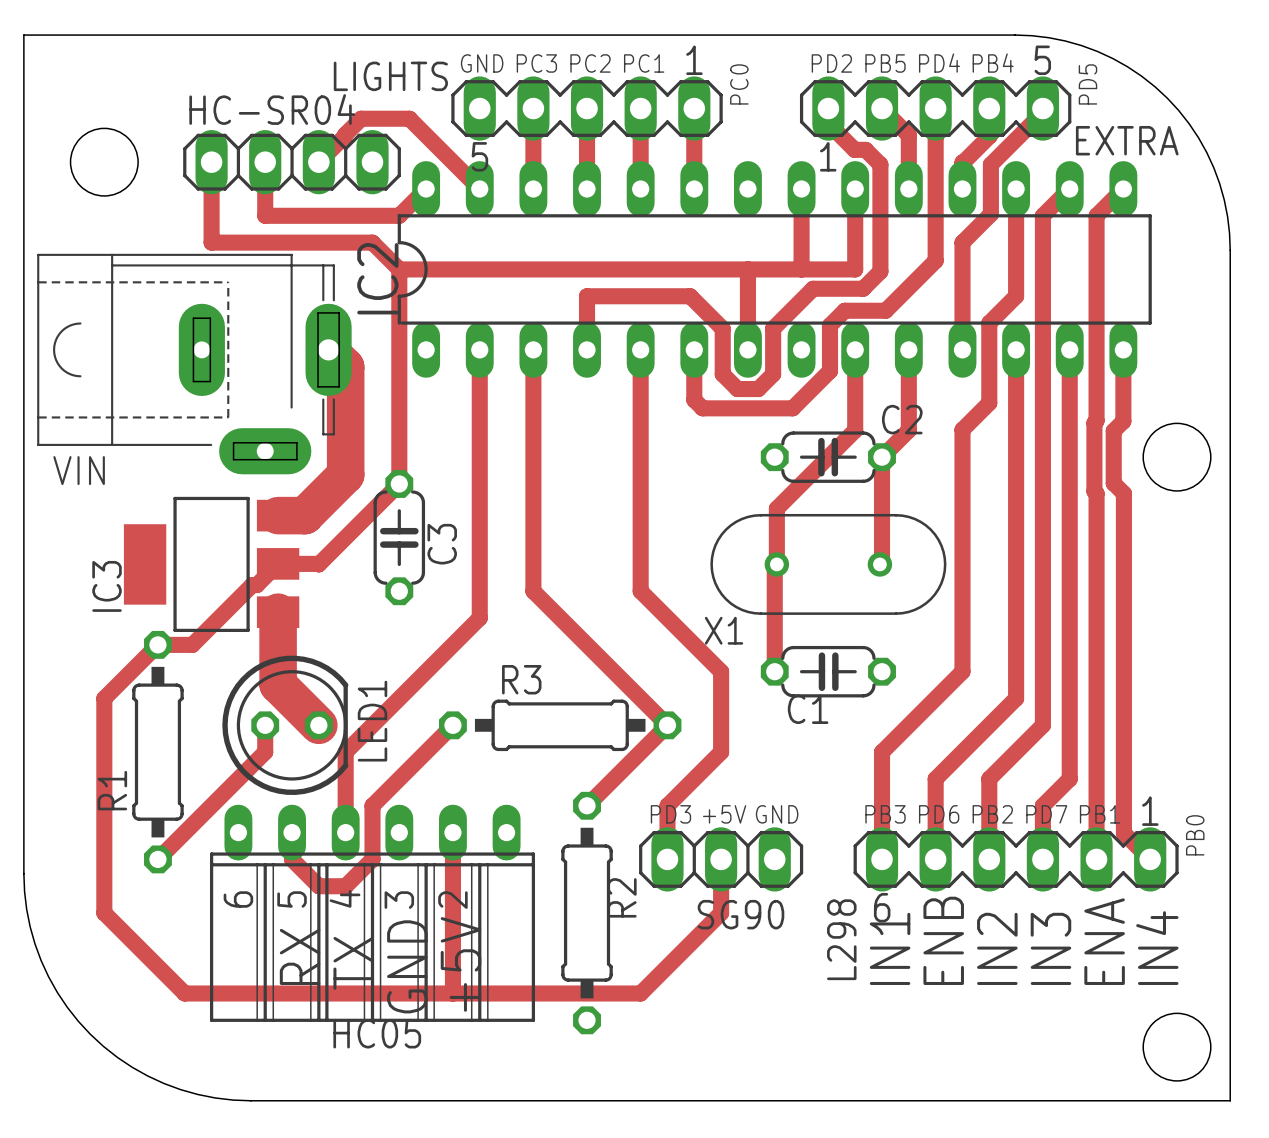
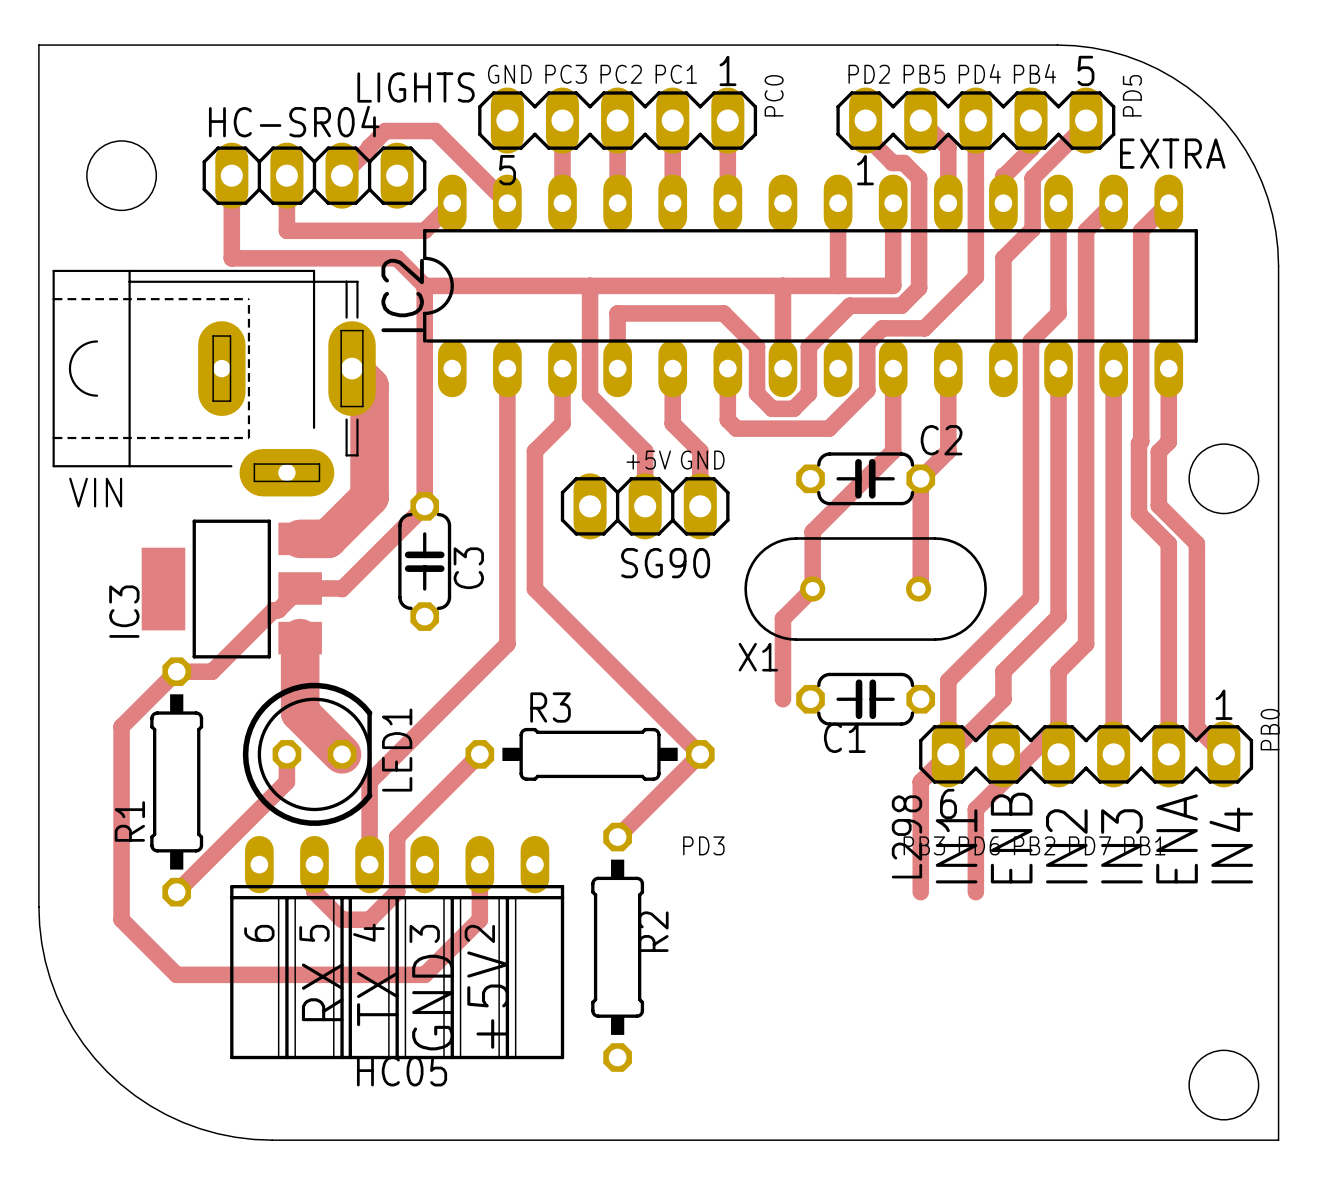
top track: none -> (590, 285) (590, 396) (645, 451) (645, 506)
top track: (533, 403) (533, 591) -> (562, 423) (534, 451) (534, 589) (562, 616)
top track: (640, 403) (640, 591) (721, 671) (721, 752) (667, 805) (667, 859) -> (672, 423) (700, 451) (700, 506)
top track: (989, 403) (962, 429) (962, 644) -> (1030, 423) (1030, 598) (948, 680) (948, 754)
top track: (1096, 493) (1096, 859) -> (1141, 516) (1168, 543) (1168, 754)
top track: (1123, 493) (1123, 833) (1150, 859) -> (1169, 516) (1196, 543) (1196, 727) (1223, 754)
top track: (774, 566) (774, 671) -> (810, 591) (782, 618) (782, 699)
top track: (1016, 591) (1016, 644) -> (1086, 644) (1058, 671)
top track: none -> (1058, 616) (1003, 671)
top track: (1042, 618) (1042, 725) (989, 778) (989, 859) -> none
top track: (1069, 725) (1069, 778) (1042, 805) (1042, 859) -> none
text position: +5V (724, 814) -> +5V (648, 460)
text position: GND (777, 814) -> GND (702, 460)
text position: PB0 (1195, 835) -> PB0 (1270, 729)
top track: (721, 859) (721, 913) (640, 993) (184, 993) (104, 913) (104, 886) -> (479, 919) (424, 974) (176, 974) (121, 919)
SG90 position: (721, 859) -> (645, 506)
L298 position: (1016, 859) -> (1086, 754)
top track: (452, 886) (452, 993) -> none
text position: ENB (943, 940) -> ENB (1011, 838)
text position: ENA (1104, 941) -> ENA (1177, 838)
text position: IN1 (890, 948) -> IN1 (956, 846)
text position: IN2 (997, 948) -> IN2 (1066, 846)
text position: IN3 (1050, 948) -> IN3 (1121, 846)
text position: IN4 (1157, 948) -> IN4 (1231, 845)

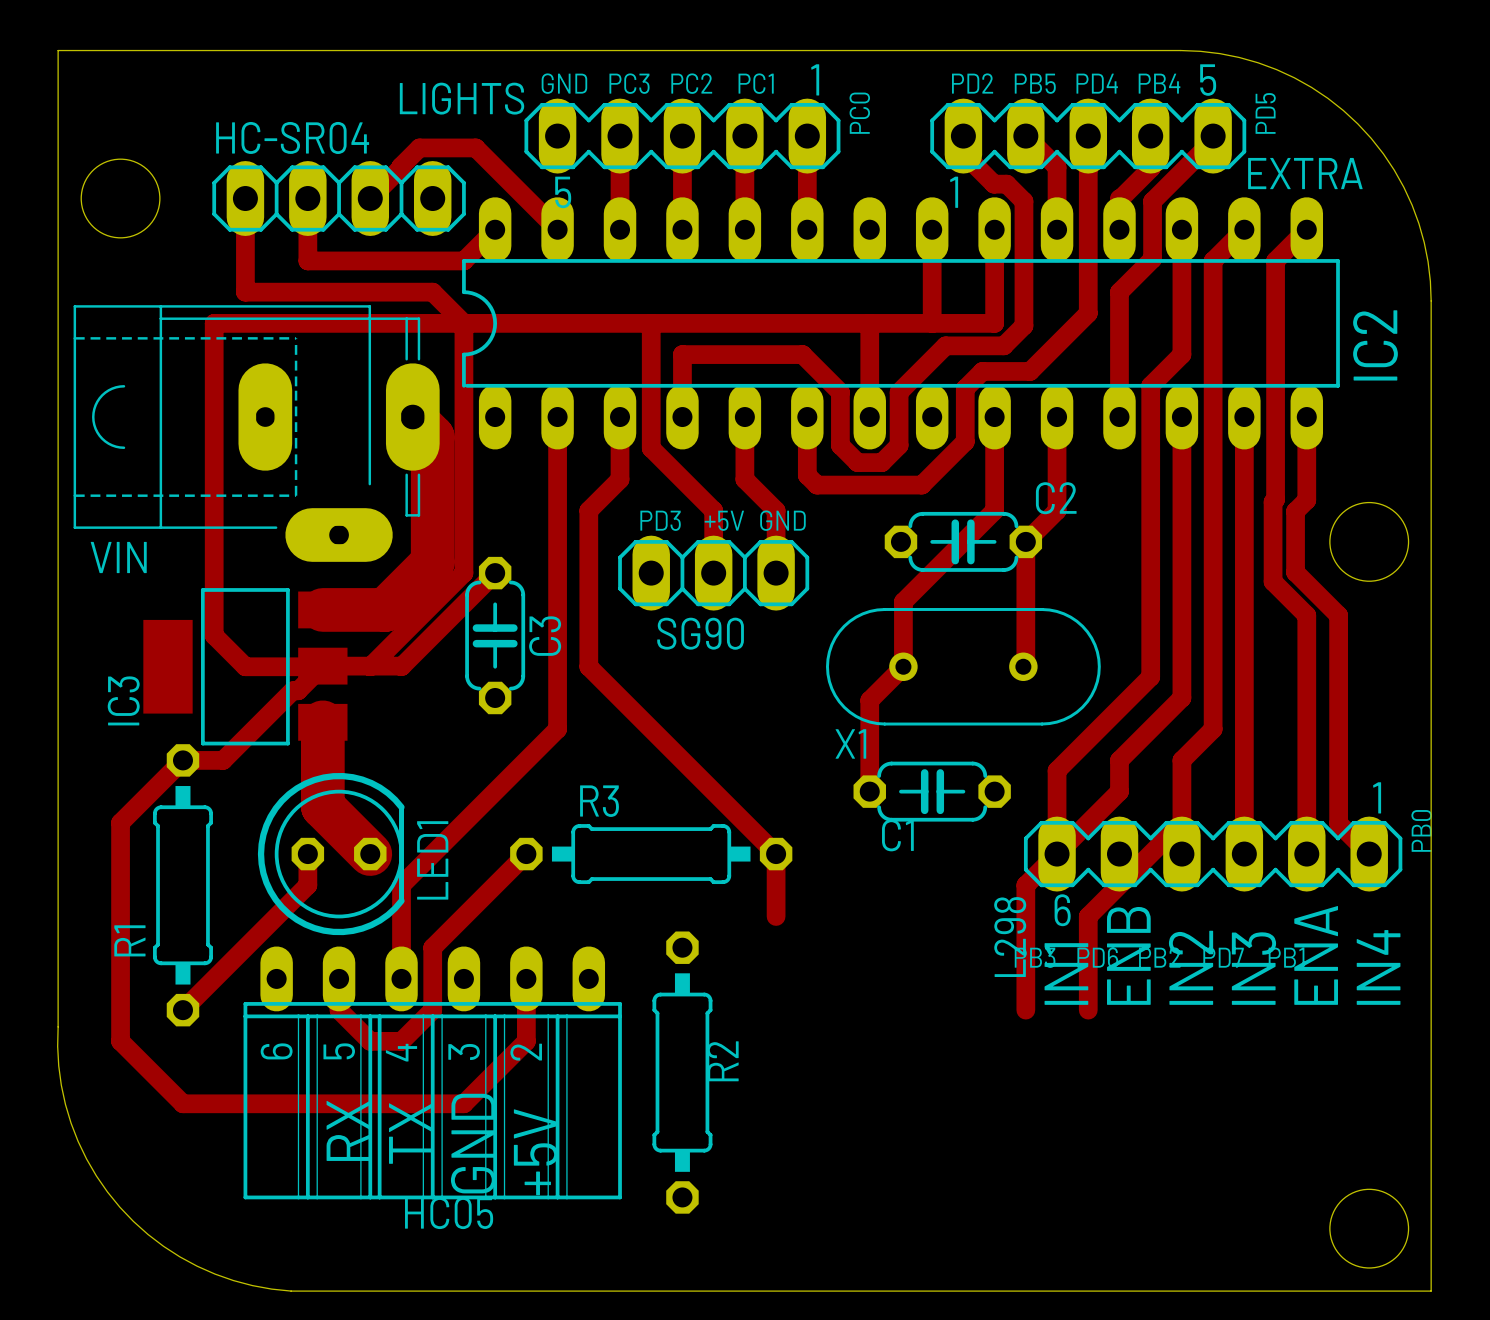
board edge: (66, 45) (38, 45) (38, 906) (41, 943) (56, 996) (73, 1028) (94, 1058) (120, 1084) (150, 1105) (182, 1122) (235, 1137) (272, 1140) -> (58, 50) (57, 1046) (61, 1085) (71, 1123) (86, 1159) (107, 1192) (133, 1221) (163, 1246) (197, 1266) (233, 1280) (271, 1289) (291, 1291)
top track: none -> (463, 323) (214, 323) (214, 635) (245, 666) (322, 666)
IC2 name position: IC2 (402, 295) -> IC2 (1375, 345)
top track: (352, 368) (369, 386) (369, 496) (327, 538) -> (412, 417) (432, 436) (432, 562) (385, 609) (354, 609)
VIN position: (214, 383) -> (256, 433)
top track: none -> (495, 573) (402, 666) (369, 666)
C3 position: (424, 561) -> (495, 635)
SG90 name position: SG90 (665, 563) -> SG90 (700, 633)
C1 position: (865, 699) -> (932, 791)
top track: (700, 754) (617, 837) -> (776, 854) (776, 916)
text position: PD3 (703, 845) -> PD3 (660, 520)

